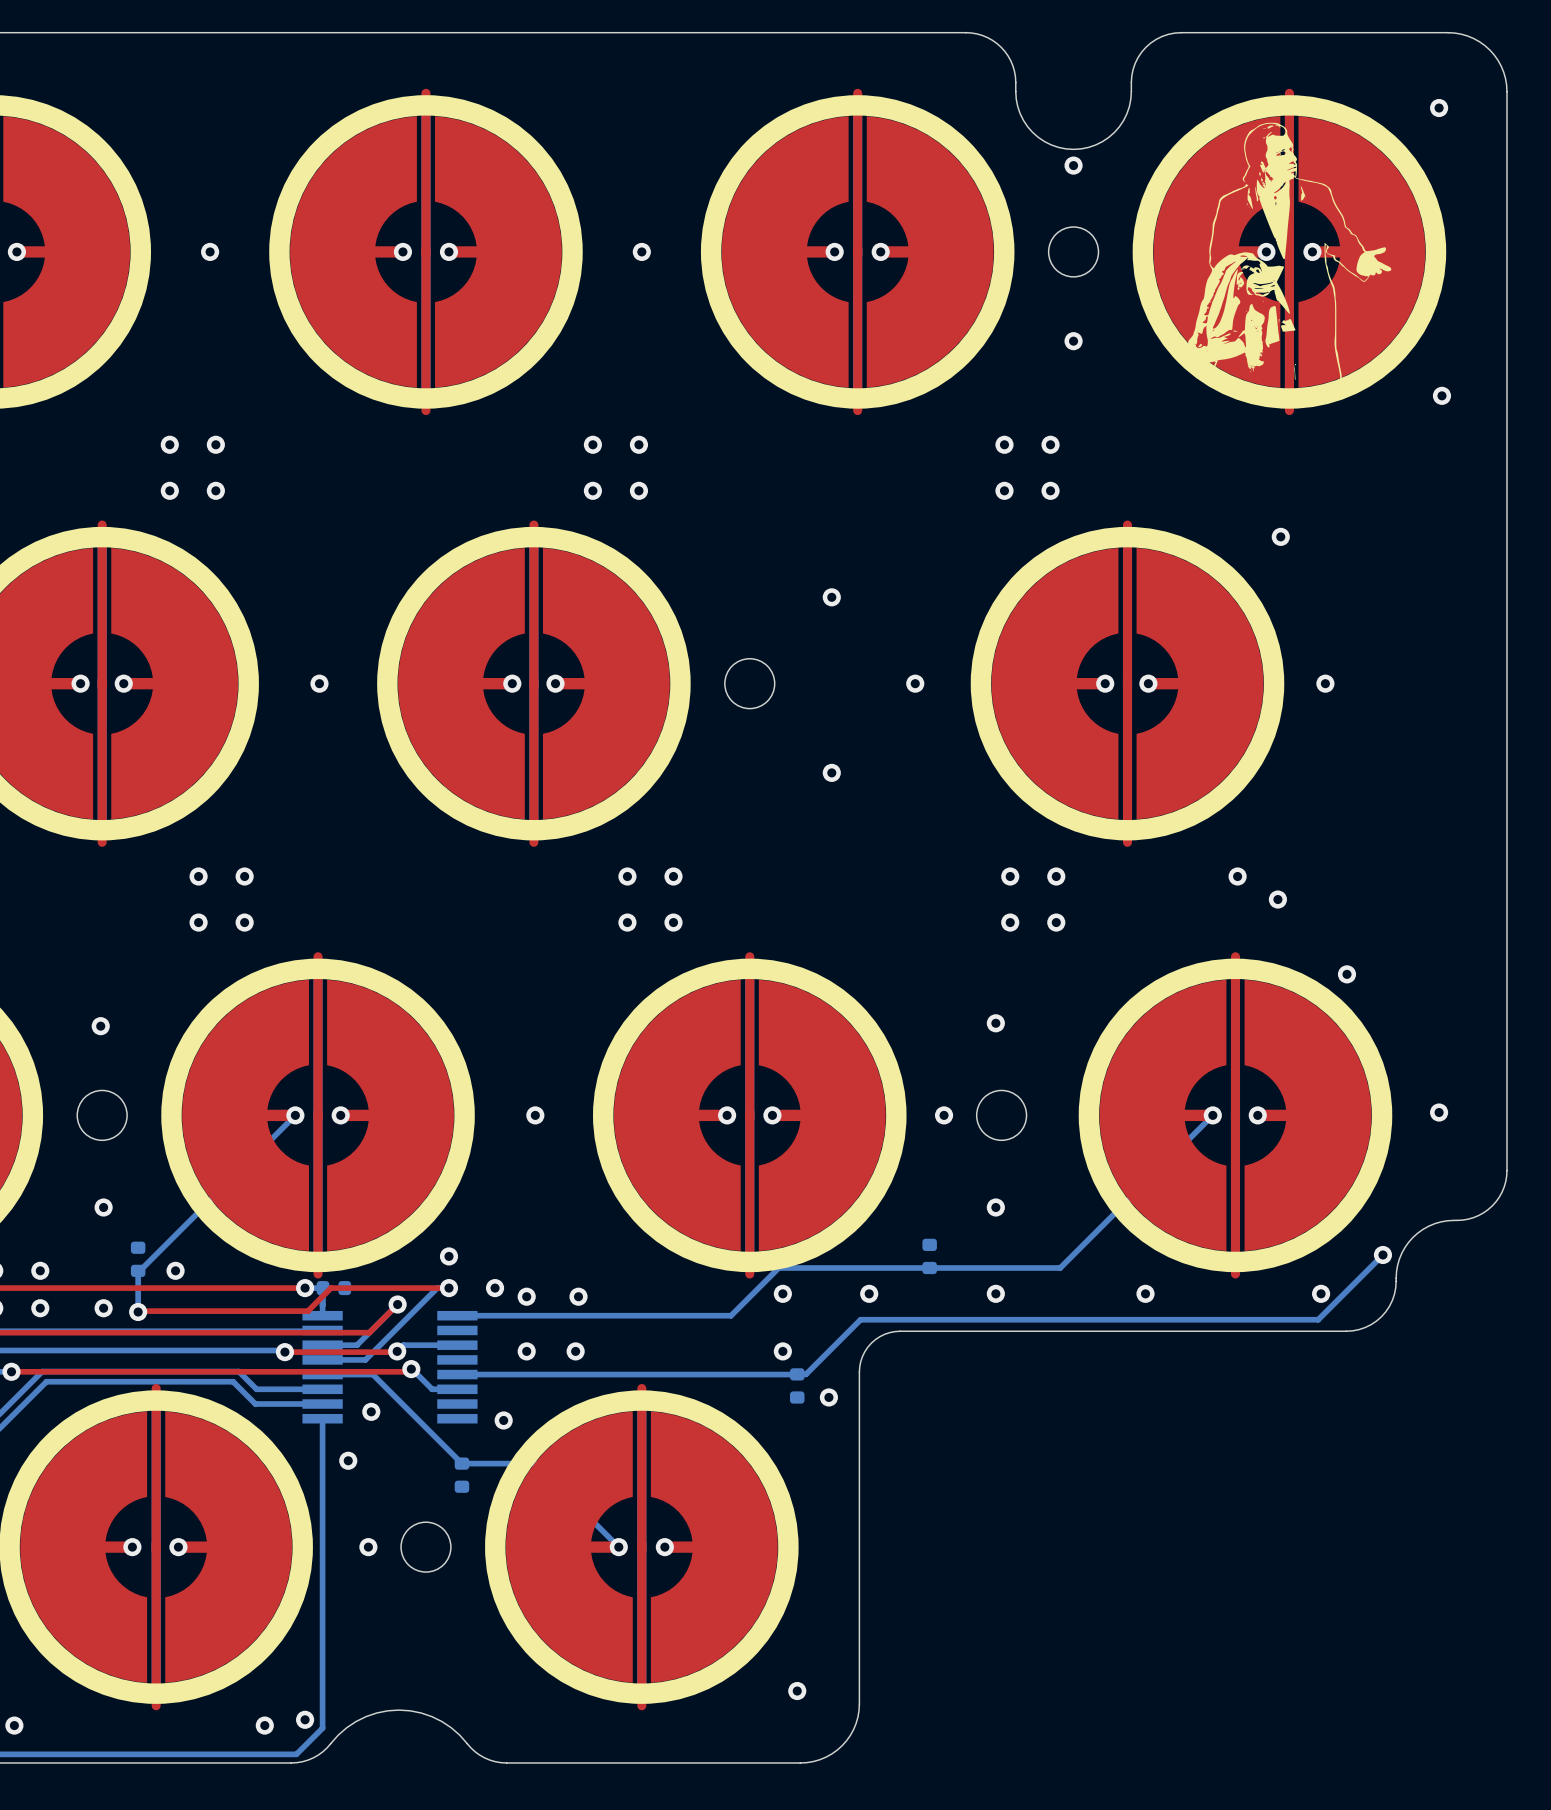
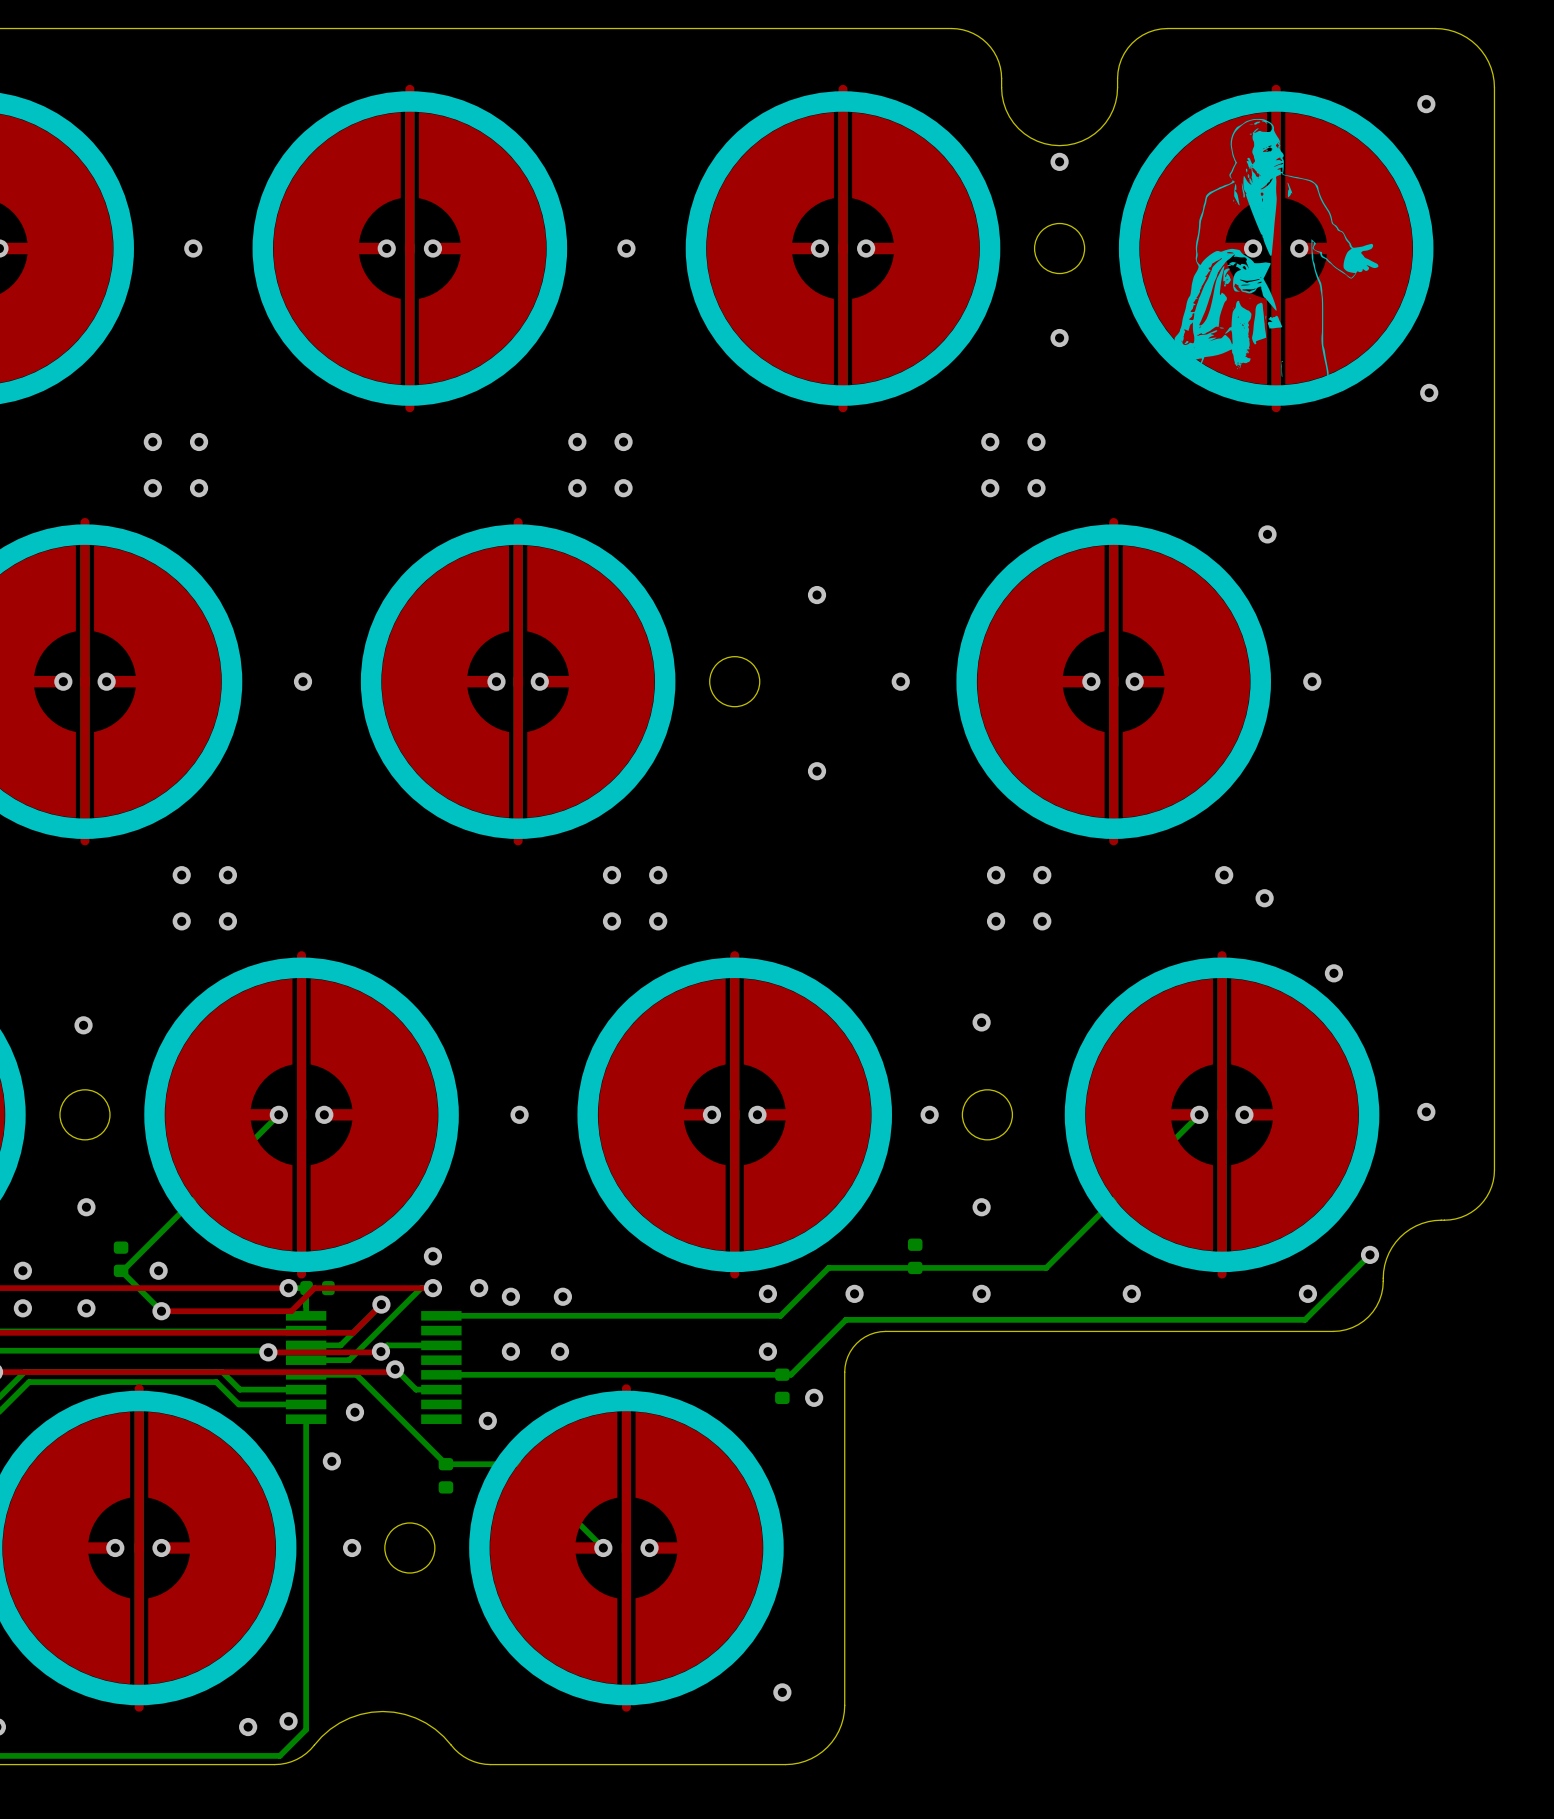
bottom track: (843, 1267) (778, 1267) (731, 1315) -> (828, 1267) (780, 1315) (715, 1315)
bottom track: (138, 1270) (138, 1312) -> (121, 1270) (161, 1311)
top track: (178, 1311) (138, 1312) -> none
via position: (138, 1312) -> (161, 1311)

